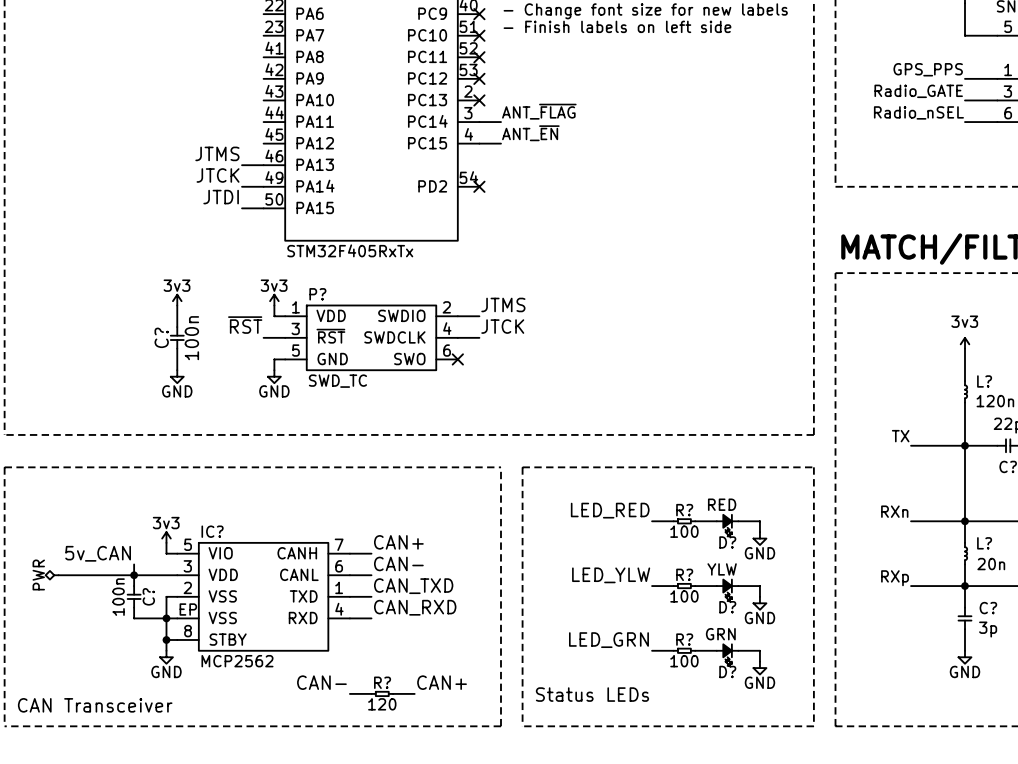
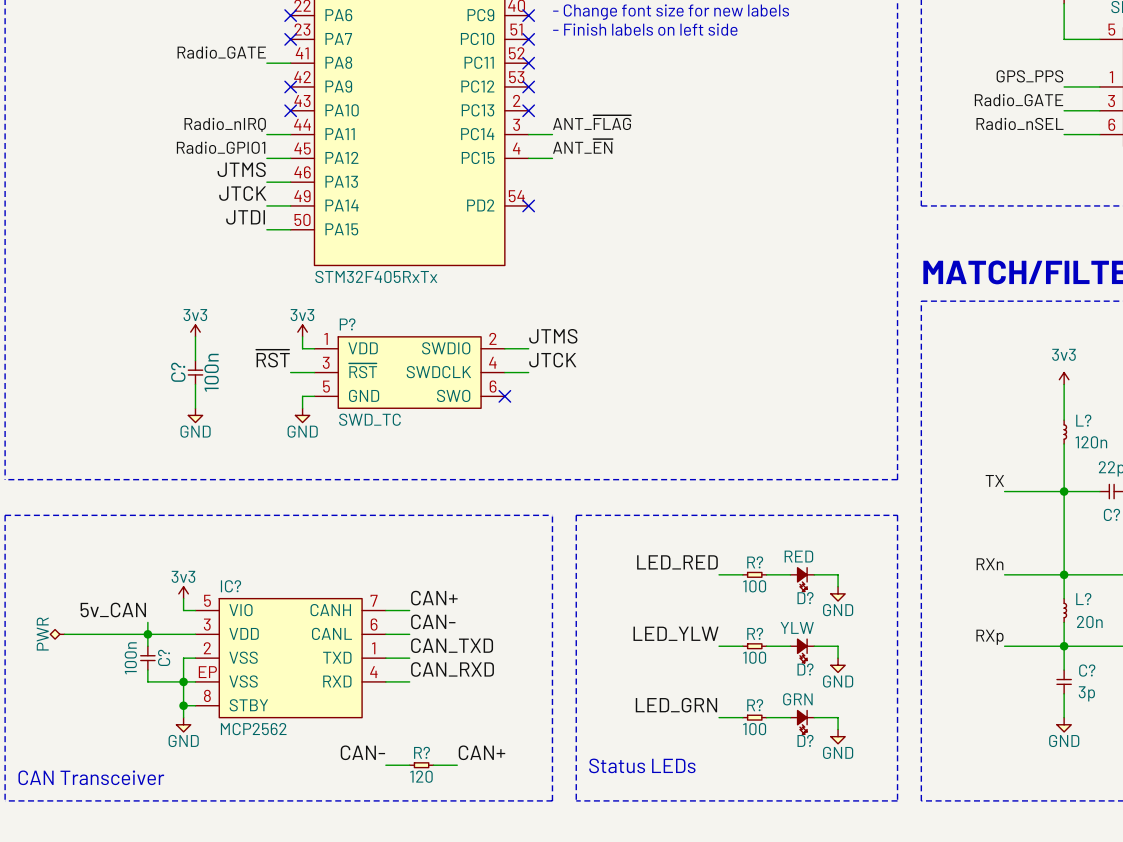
no-connect mark: none -> (290, 15)
no-connect mark: none -> (290, 39)
label: none -> Radio_GATE (221, 52)
wire: none -> (266, 63) (290, 63)
no-connect mark: none -> (290, 86)
no-connect mark: none -> (290, 110)
label: none -> Radio_nIRQ (225, 124)
wire: none -> (266, 134) (290, 134)
label: none -> Radio_GPIO1 (221, 147)
wire: none -> (266, 158) (290, 158)

